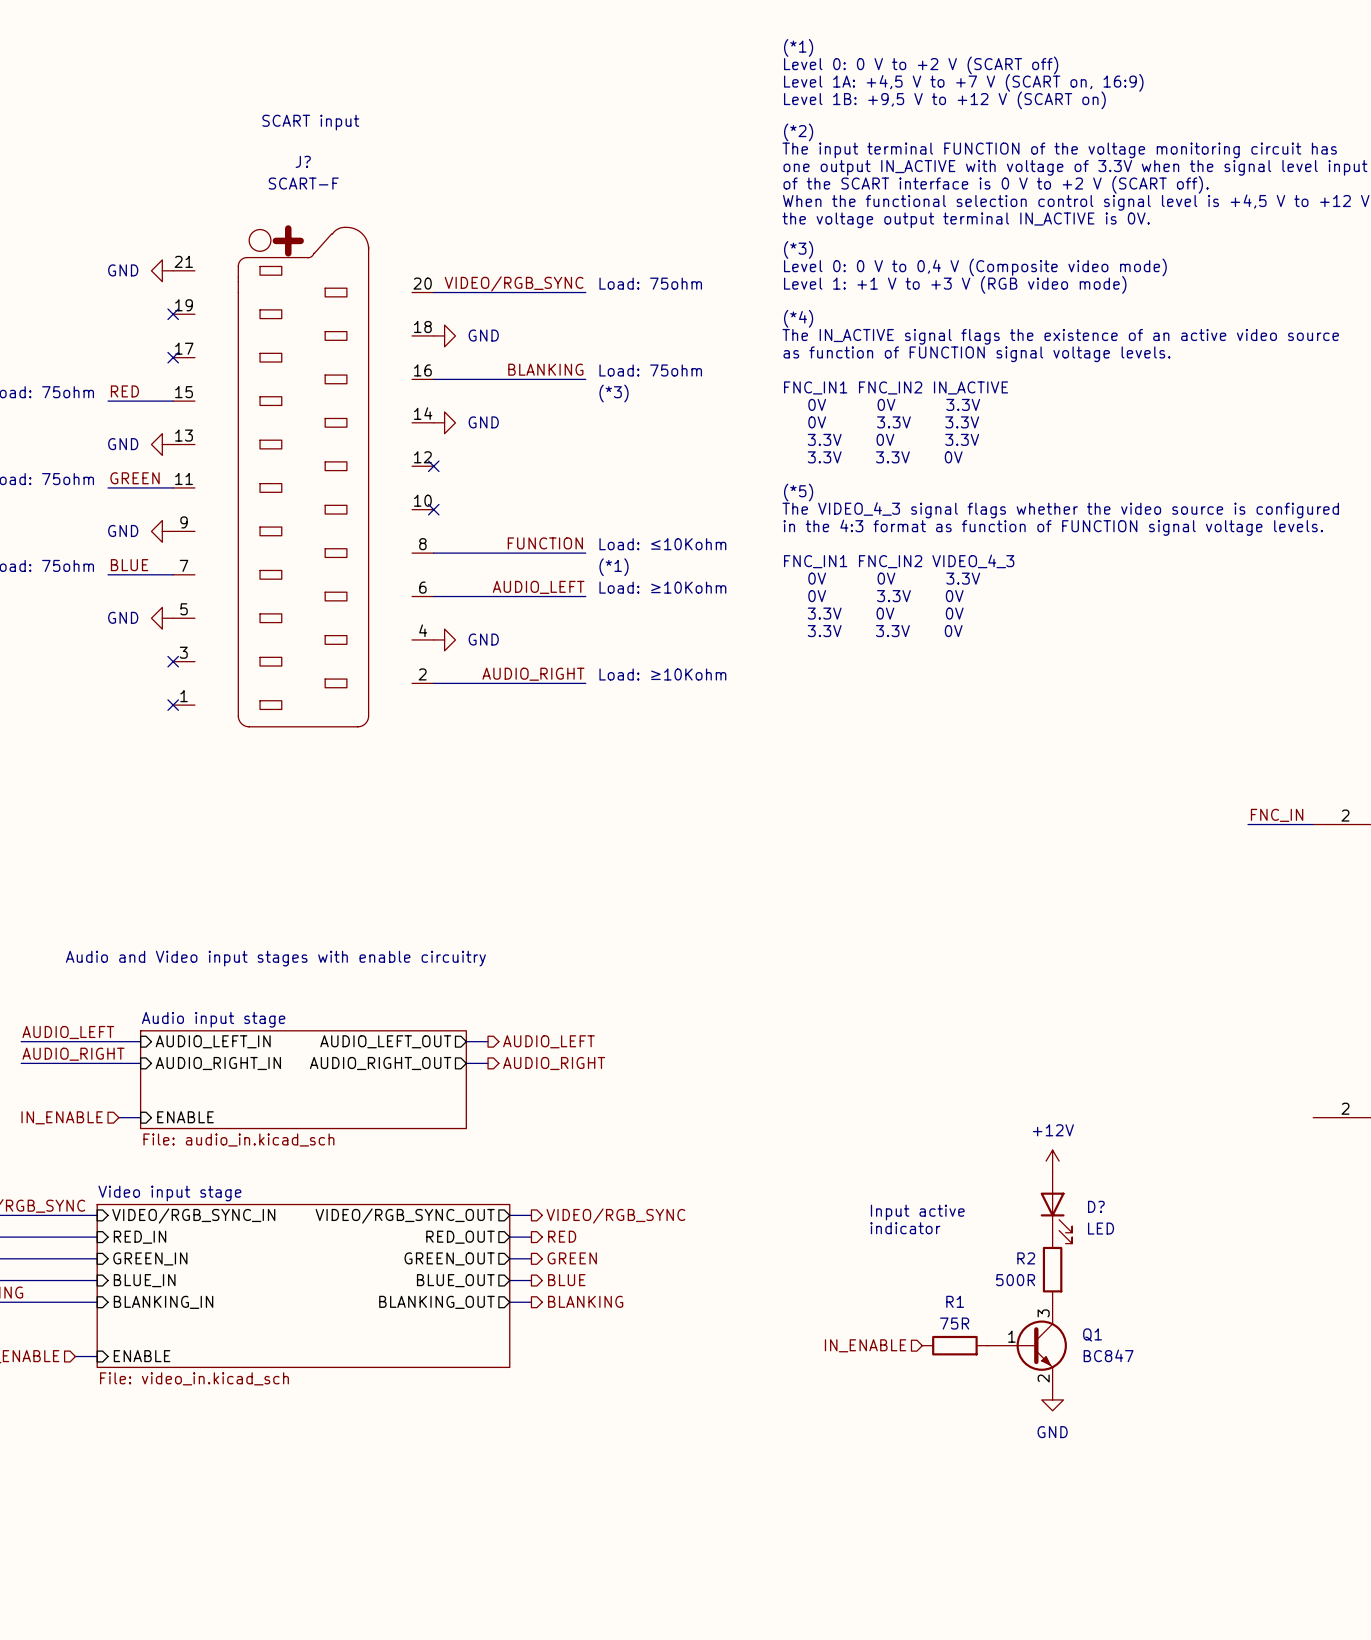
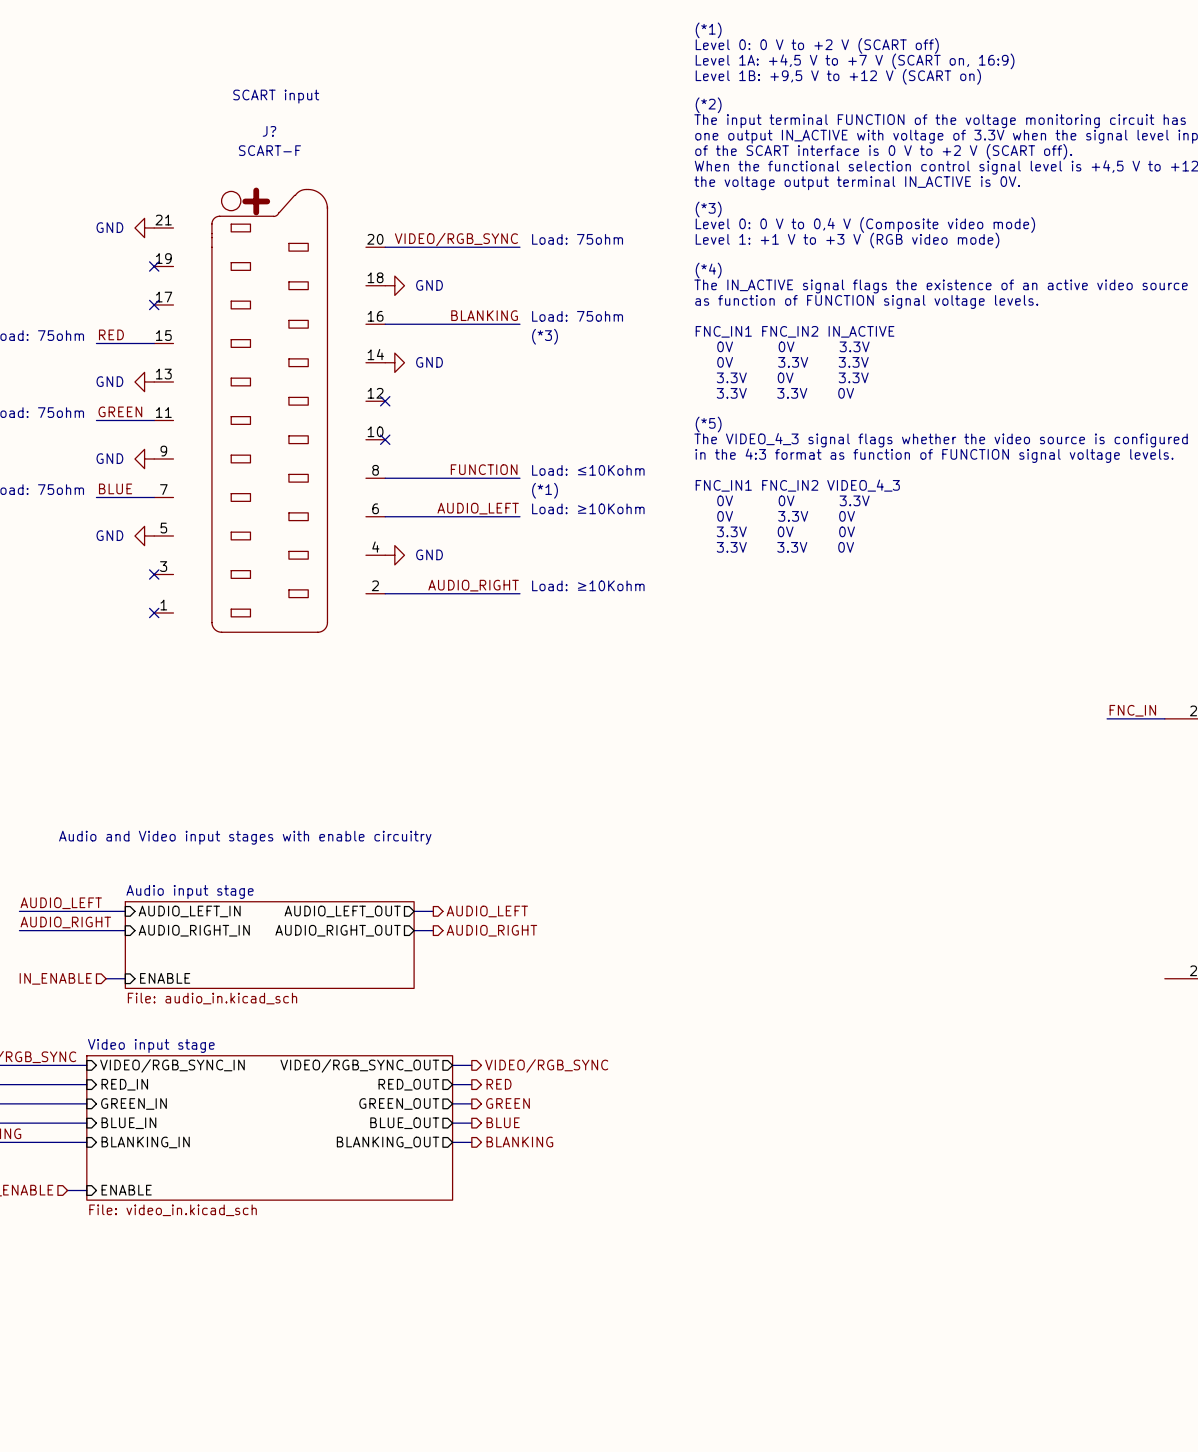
power symbol: +12V (1052, 1161) -> none
D?: LED (1056, 1207) -> none
text: Input active (917, 1212) -> none
text: indicator (905, 1228) -> none
R2: 500R (1052, 1269) -> none
hierarchical label: IN_ENABLE (865, 1345) -> none
R1: 75R (954, 1345) -> none
Q1: BC847 (1027, 1345) -> none
power symbol: GND (1052, 1399) -> none

